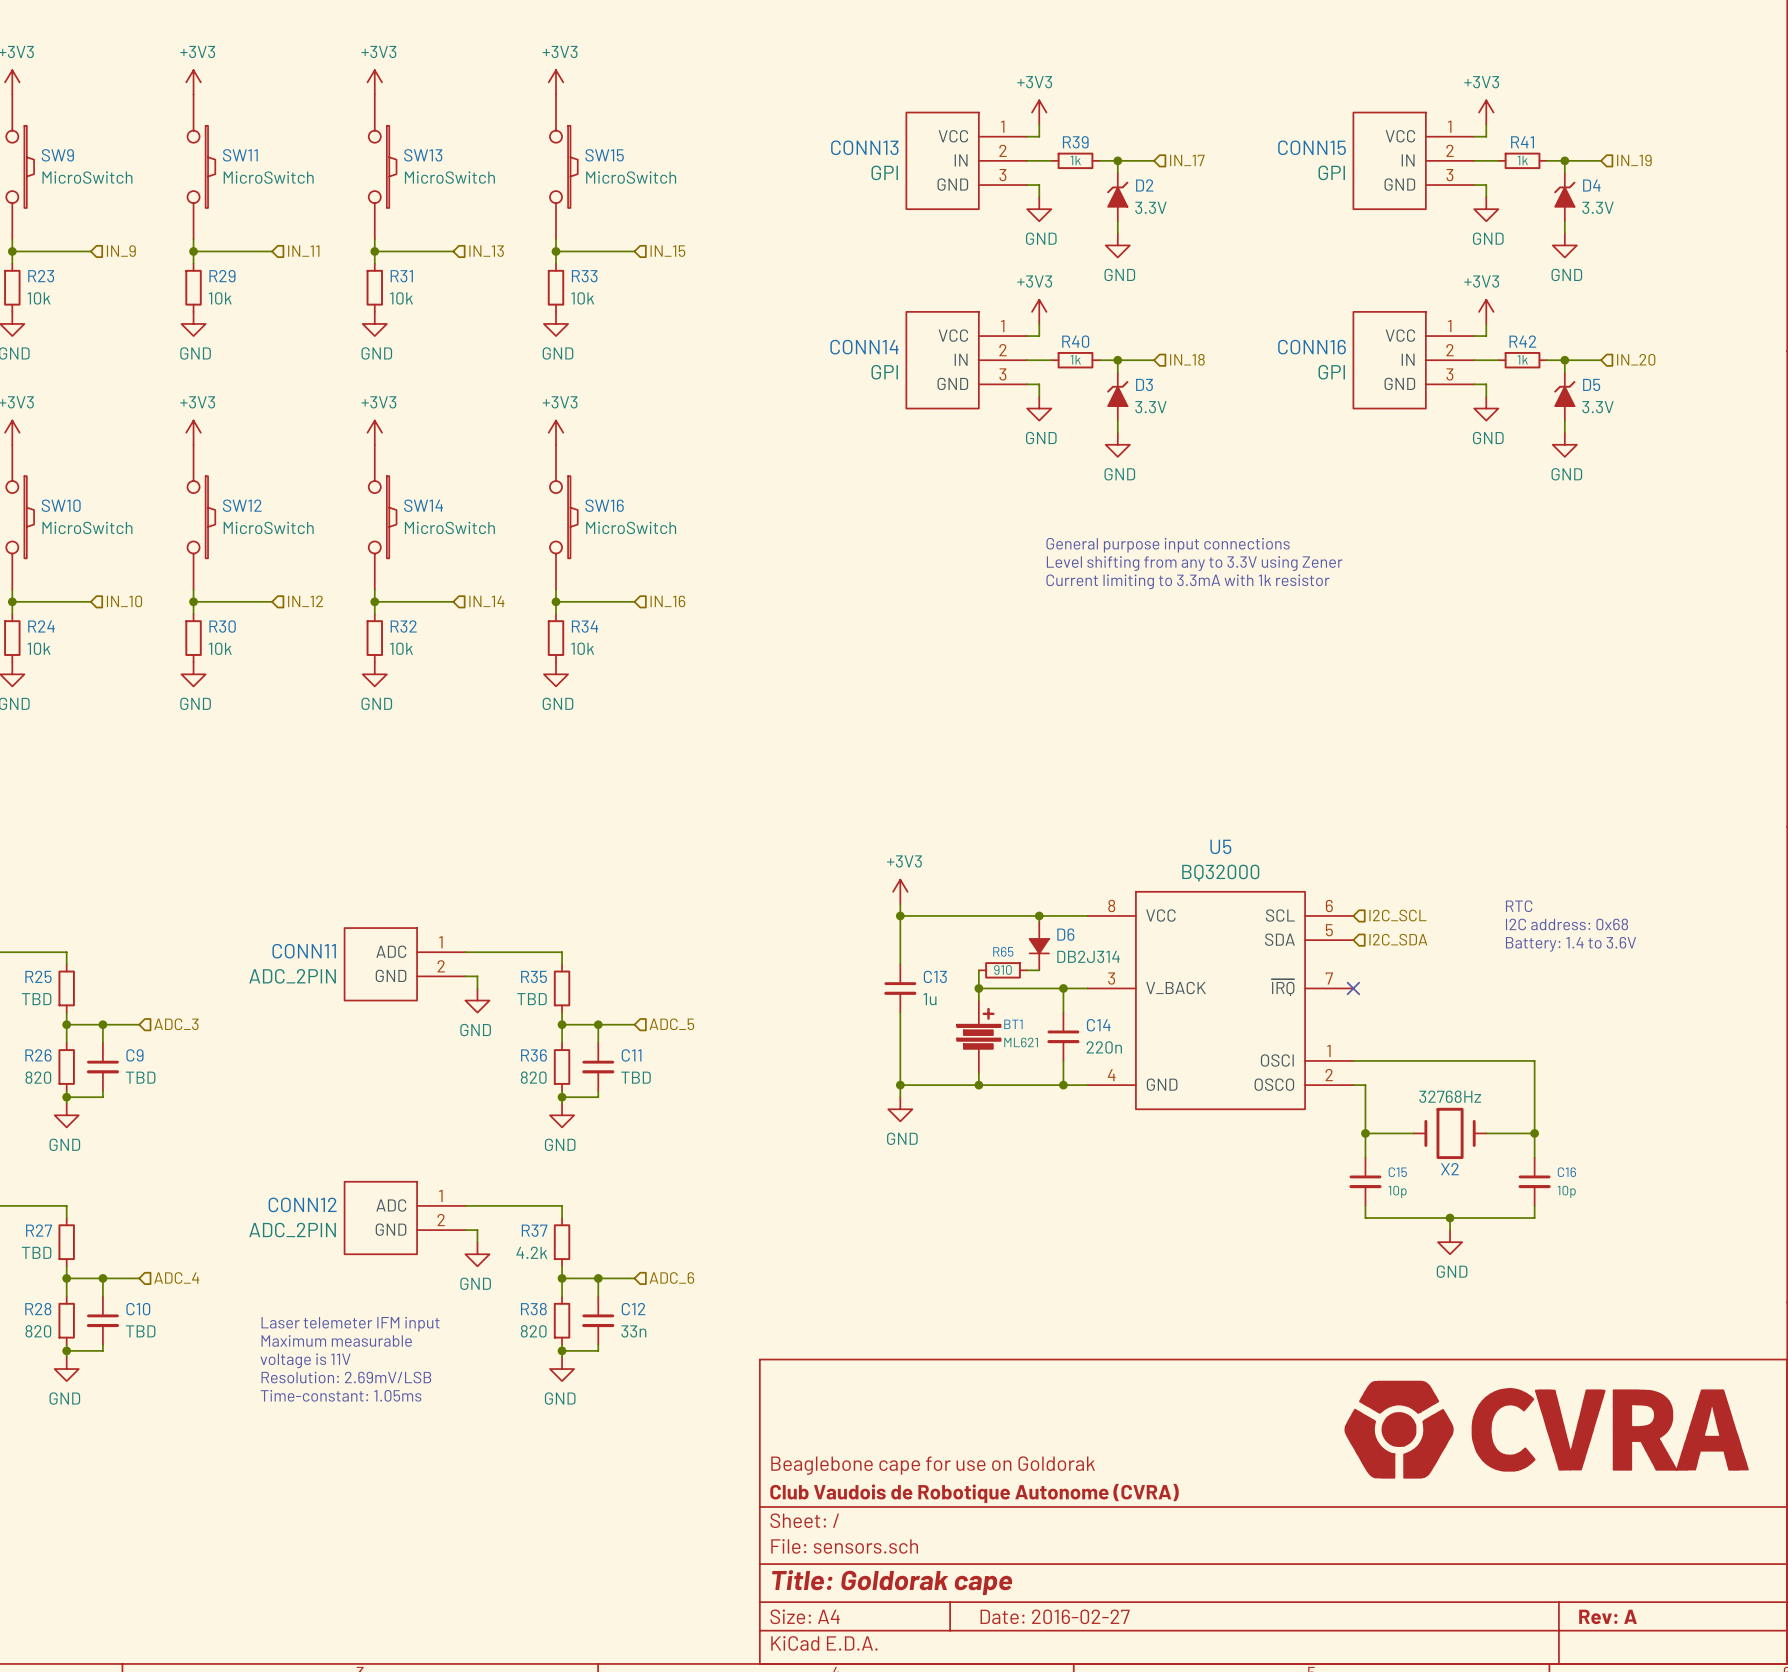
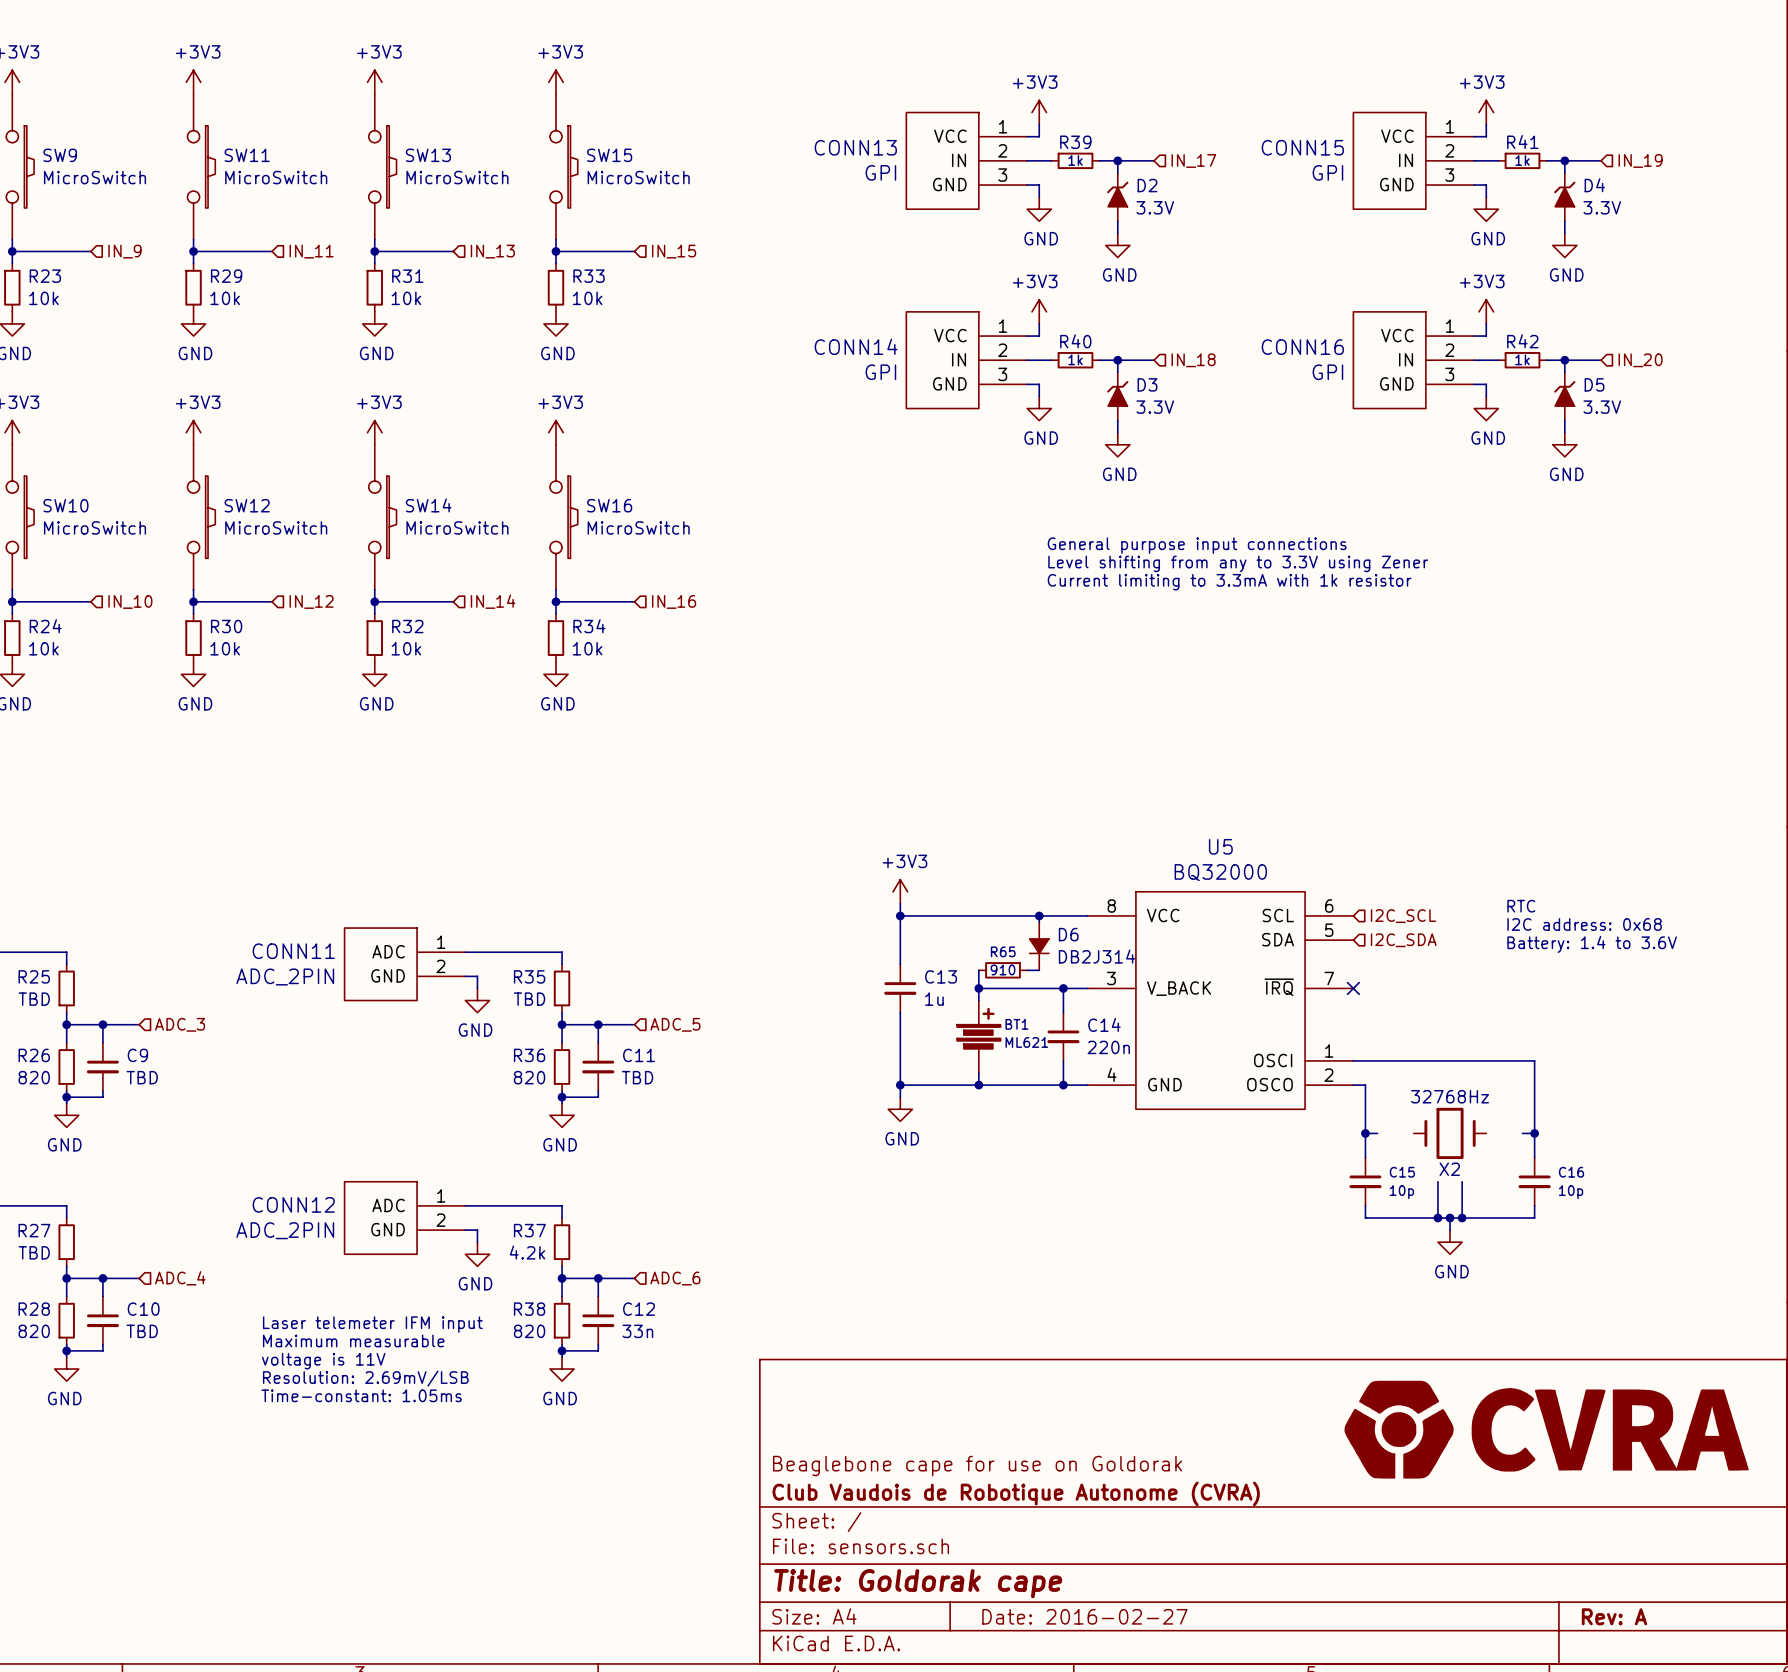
wire: (1377, 1133) (1413, 1133) -> none
wire: (1486, 1133) (1522, 1133) -> none
wire: none -> (1437, 1181) (1437, 1218)
wire: none -> (1462, 1181) (1462, 1218)
junction: none -> (1437, 1218)
junction: none -> (1462, 1218)

